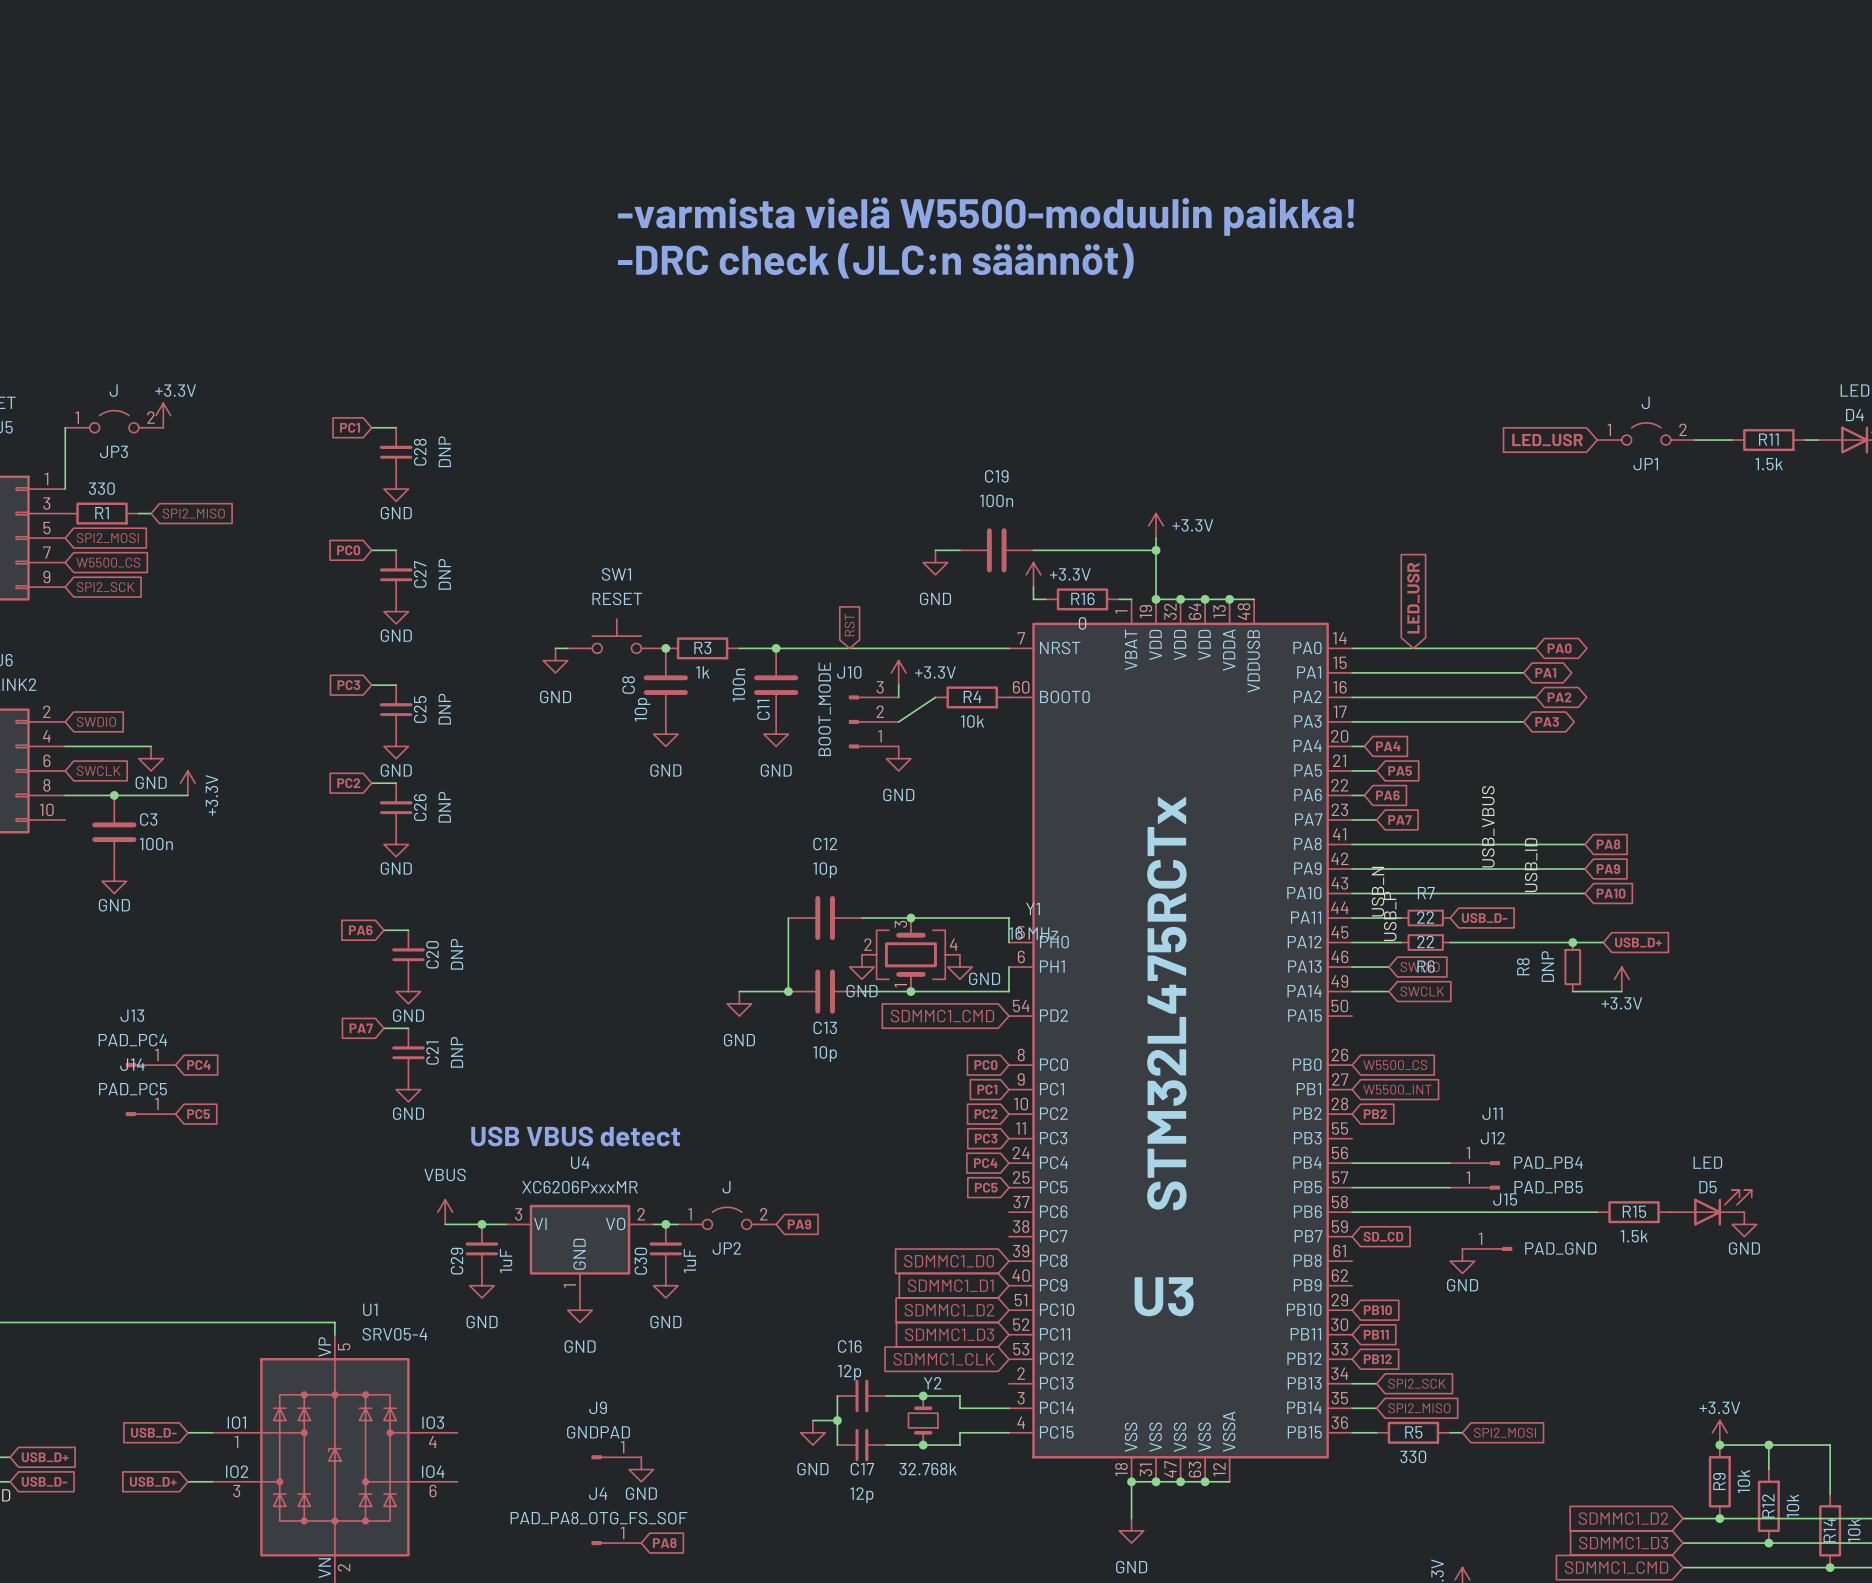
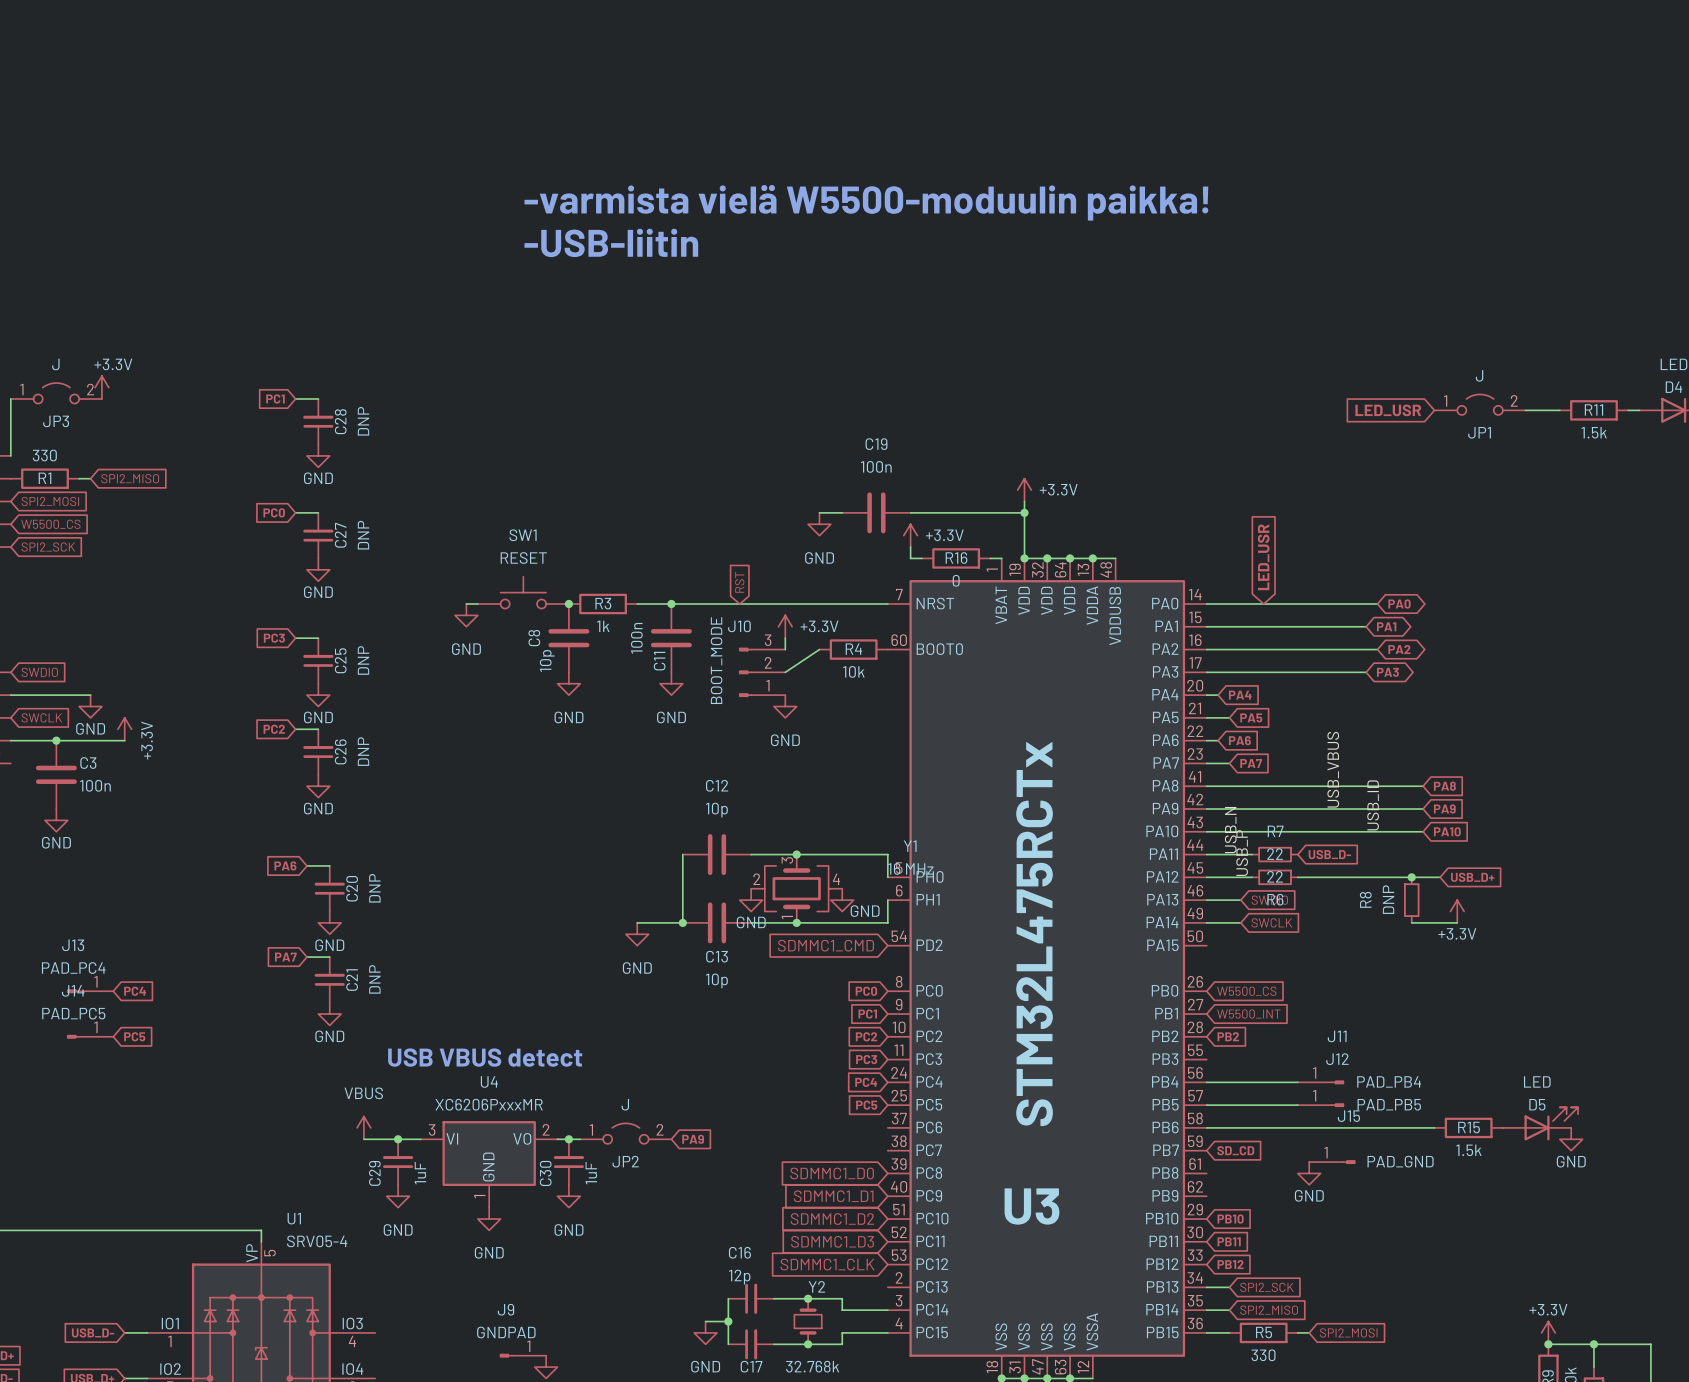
text: -DRC check (JLC:n säännöt) (875, 260) -> -USB-liitin (611, 242)

